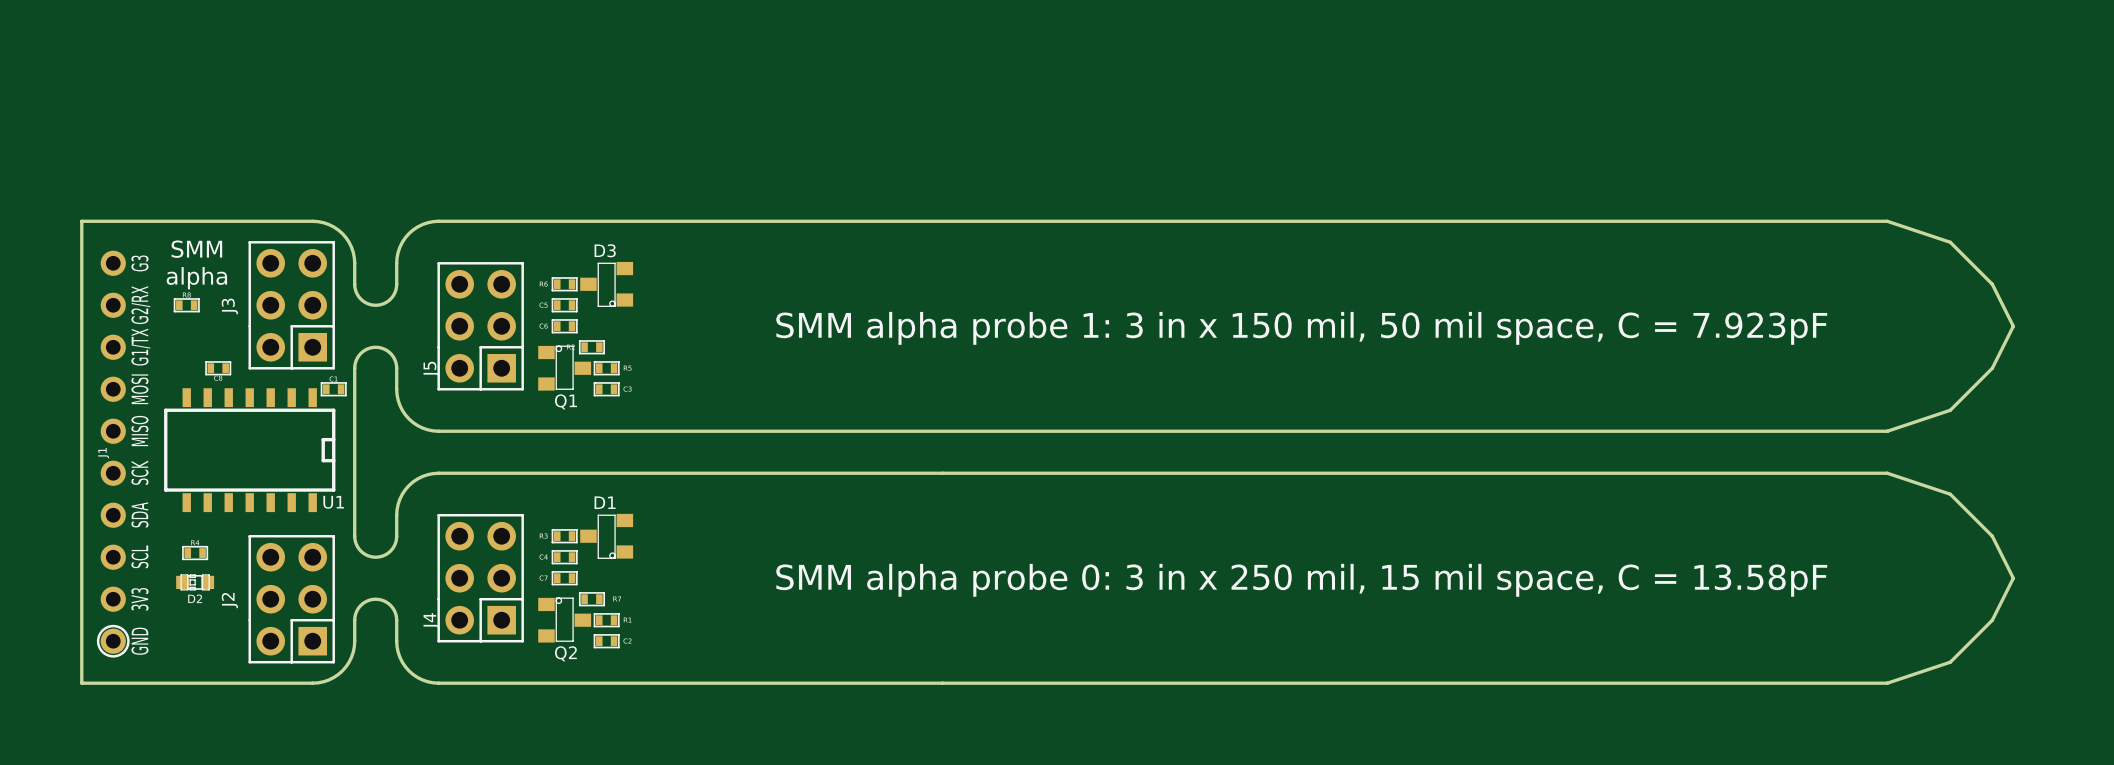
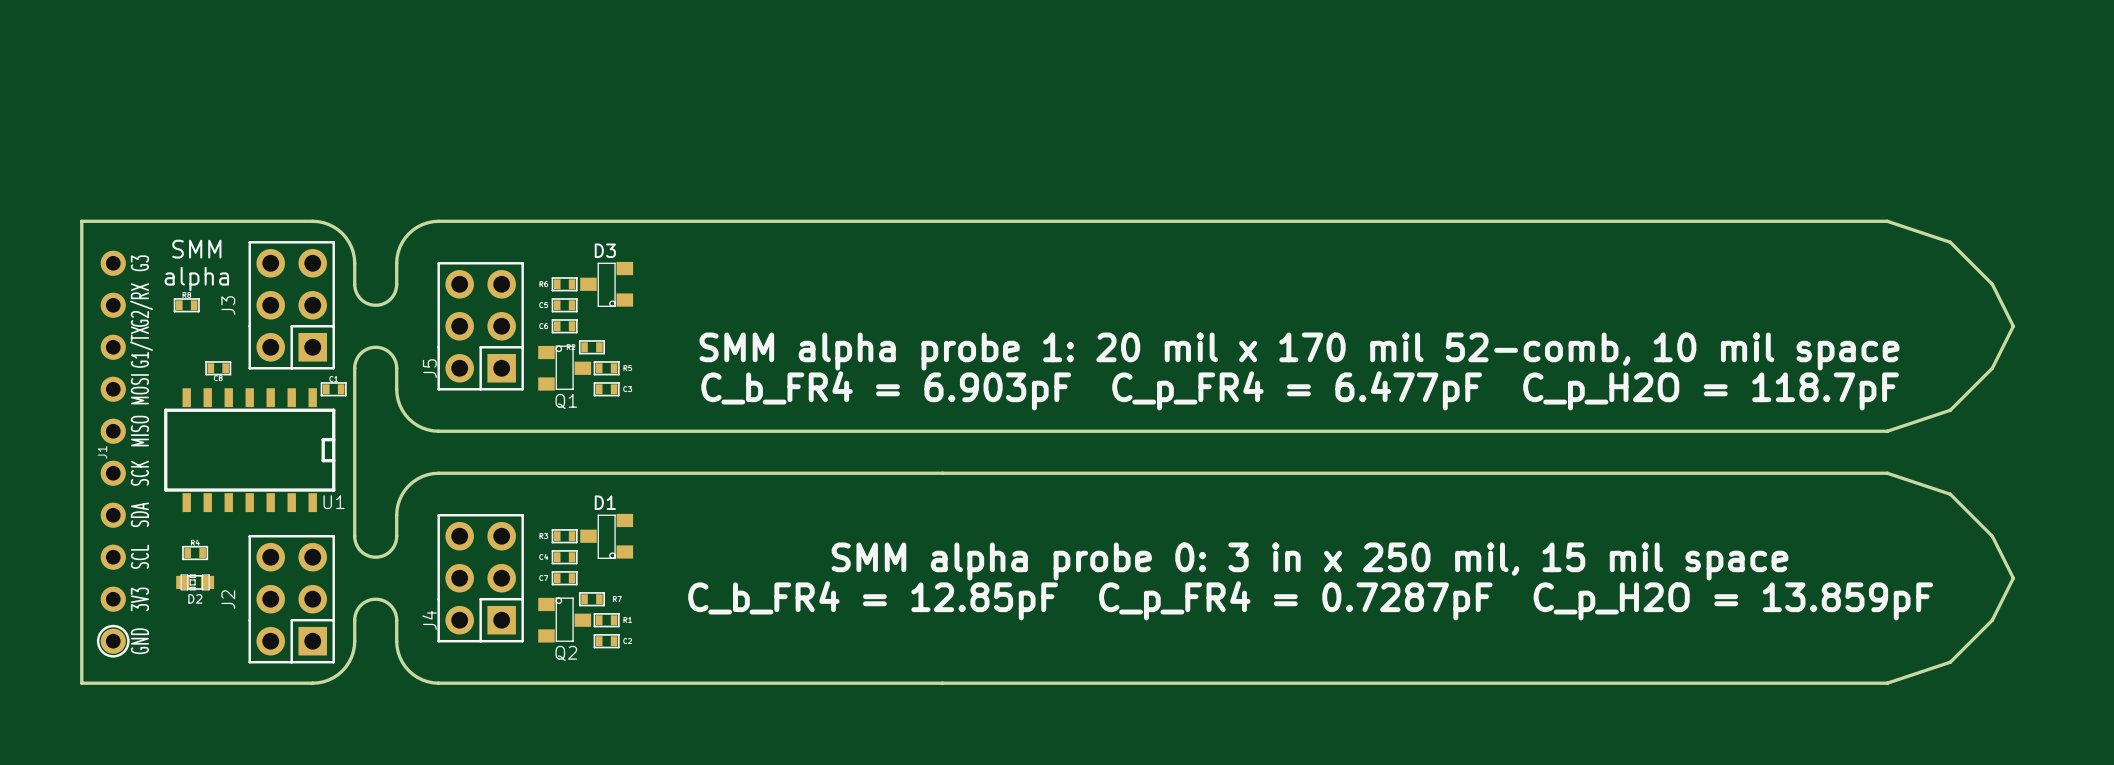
text: SMM alpha probe 1: 3 in x 150 mil, 50 mil space, C = 7.923pF (1301, 328) -> SMM alpha probe 1: 20 mil x 170 mil 52-comb, 10 mil space (1299, 351)
text: none -> C_b_FR4 = 6.903pF C_p_FR4 = 6.477pF C_p_H2O = 118.7pF (1300, 390)
text: SMM alpha probe 0: 3 in x 250 mil, 15 mil space, C = 13.58pF (1301, 580) -> SMM alpha probe 0: 3 in x 250 mil, 15 mil space (1309, 561)
text: none -> C_b_FR4 = 12.85pF C_p_FR4 = 0.7287pF C_p_H2O = 13.859pF (1310, 600)

